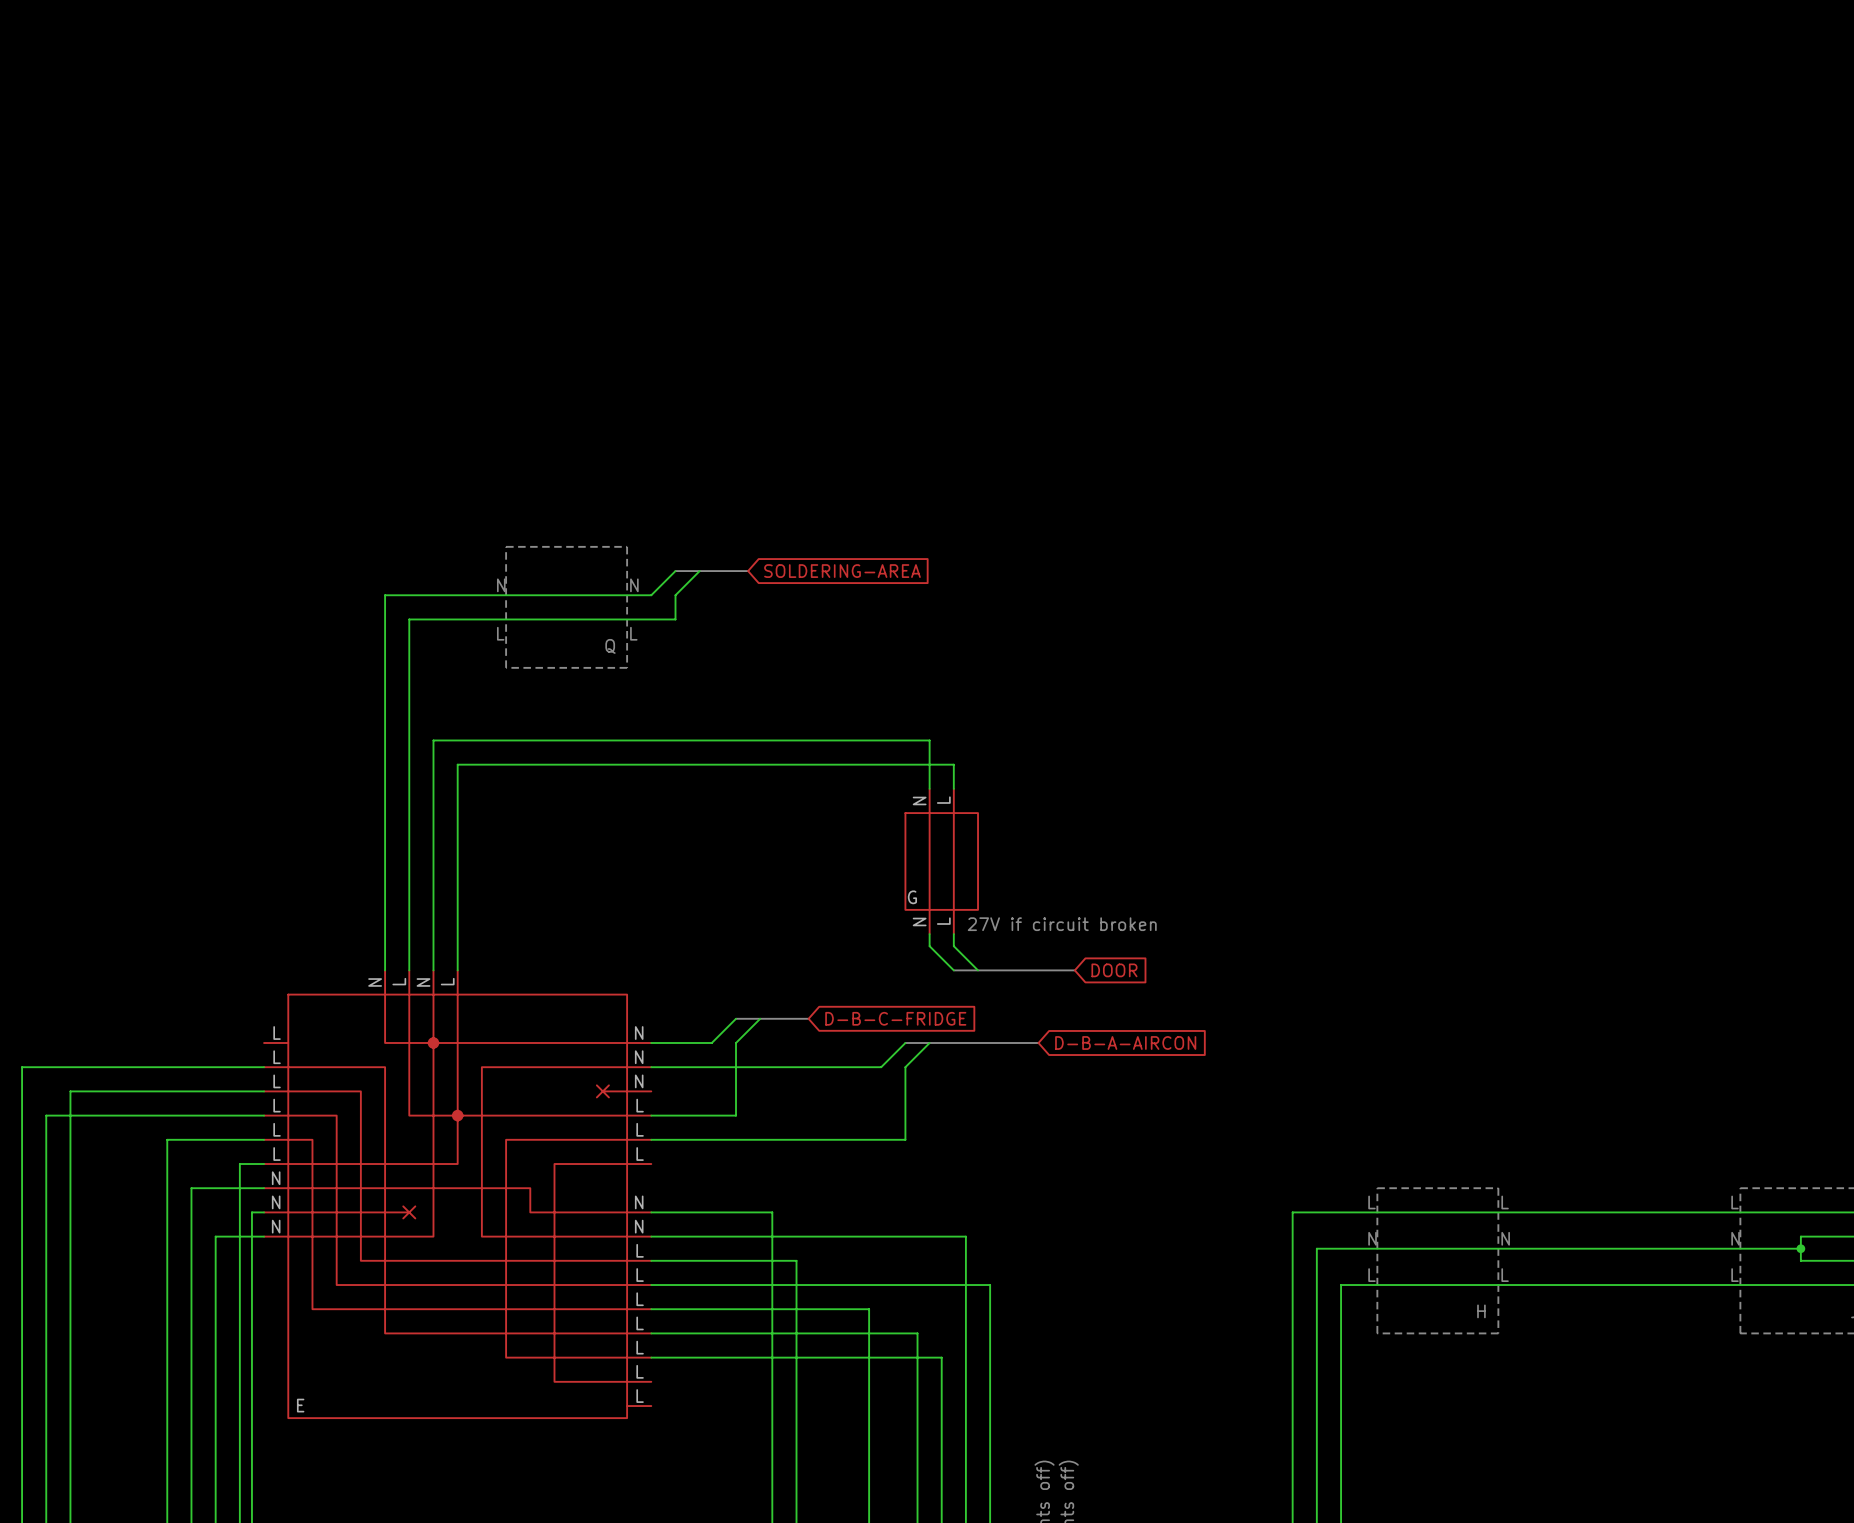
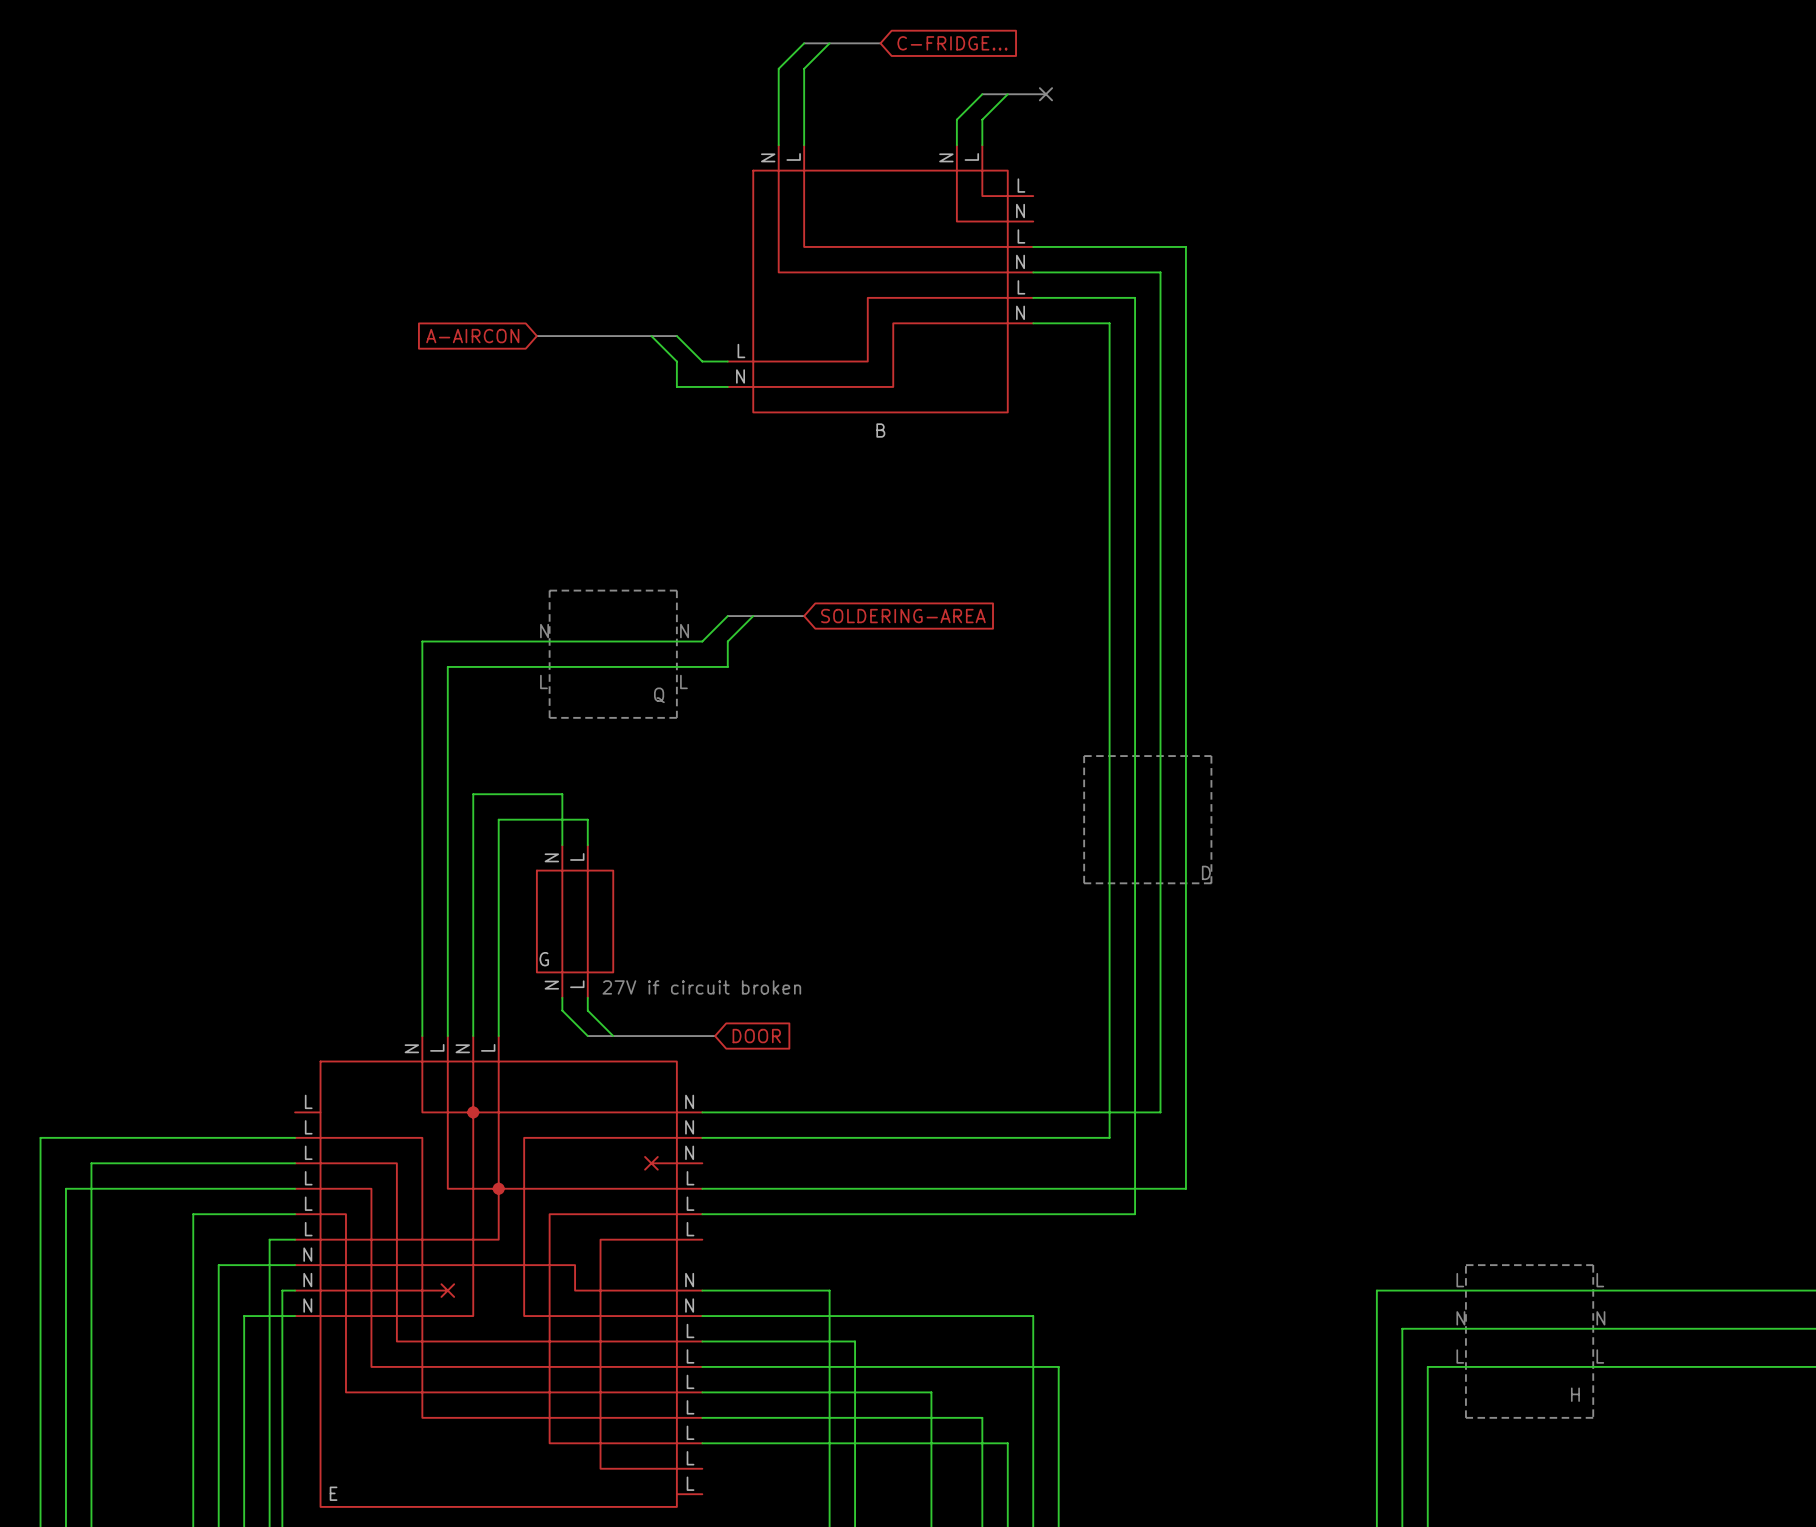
wire: none -> (804, 43) (778, 68) (778, 145)
bus: none -> (804, 43) (880, 43)
wire: none -> (829, 43) (804, 68) (804, 145)
global label: none -> C-FRIDGE... (952, 43)
wire: none -> (982, 94) (956, 119) (956, 145)
bus: none -> (982, 94) (1045, 94)
wire: none -> (1007, 94) (982, 119) (982, 145)
no-connect mark: none -> (1045, 94)
part: none -> B (880, 278)
global label: none -> A-AIRCON (472, 336)
bus: none -> (536, 336) (676, 336)
wire: none -> (651, 336) (676, 361) (676, 386) (727, 386)
wire: none -> (676, 336) (702, 361) (727, 361)
line: none -> (1084, 756) (1211, 756) (1211, 883) (1084, 883) (1084, 756)
wire: (518, 740) (929, 740) (929, 788) -> (562, 794) (562, 845)
wire: (542, 764) (953, 764) (953, 788) -> (587, 819) (587, 845)
text: none -> D (1206, 872)
part: none -> G (575, 921)
part: G (941, 861) -> none
text: none -> 27V if circuit broken (701, 987)
text: 27V if circuit broken (1062, 924) -> none
wire: none -> (562, 997) (562, 1010) (587, 1036)
wire: none -> (587, 997) (587, 1010) (613, 1036)
wire: (929, 934) (929, 946) (953, 970) -> none
wire: (953, 934) (953, 946) (978, 970) -> none
bus: none -> (587, 1036) (715, 1036)
global label: none -> DOOR (756, 1036)
bus: (953, 970) (1074, 970) -> none
global label: DOOR (1114, 970) -> none
wire: (736, 1018) (711, 1042) -> (1033, 272) (1160, 272) (1160, 1112) (765, 1112)
bus: (736, 1018) (808, 1018) -> none
wire: (760, 1018) (736, 1042) (736, 1115) -> (1033, 246) (1185, 246) (1185, 1188) (791, 1188)
global label: D-B-C-FRIDGE (895, 1018) -> none
wire: (905, 1042) (881, 1067) -> (1033, 323) (1109, 323) (1109, 1137) (944, 1137)
bus: (905, 1042) (1038, 1042) -> none
wire: (929, 1042) (905, 1067) (905, 1139) -> (1033, 297) (1135, 297) (1135, 1214) (969, 1214)
global label: D-B-A-AIRCON (1125, 1042) -> none

